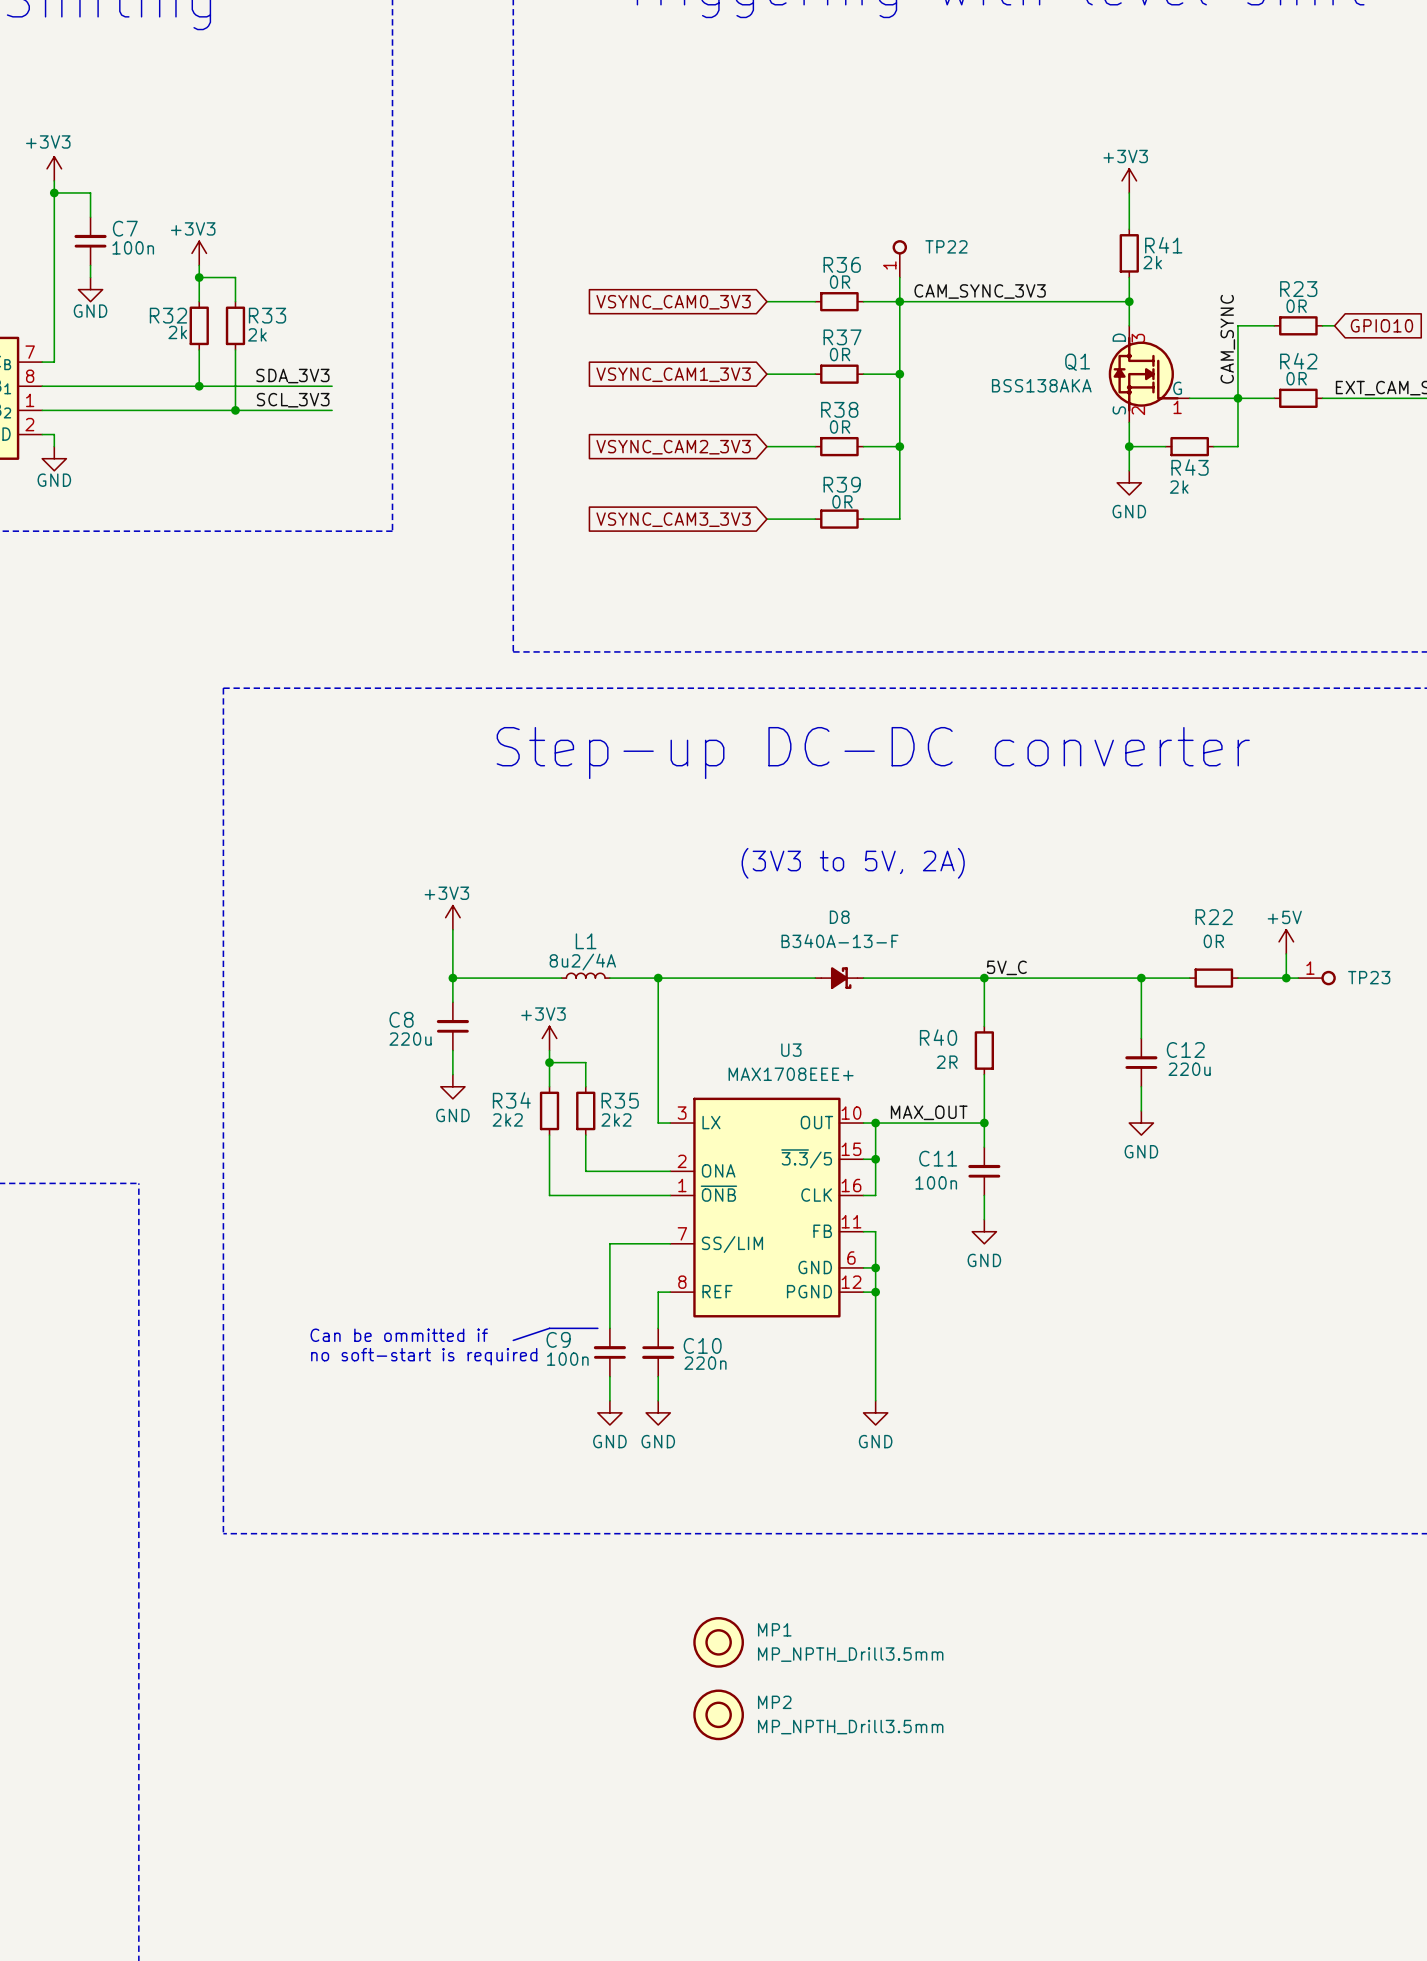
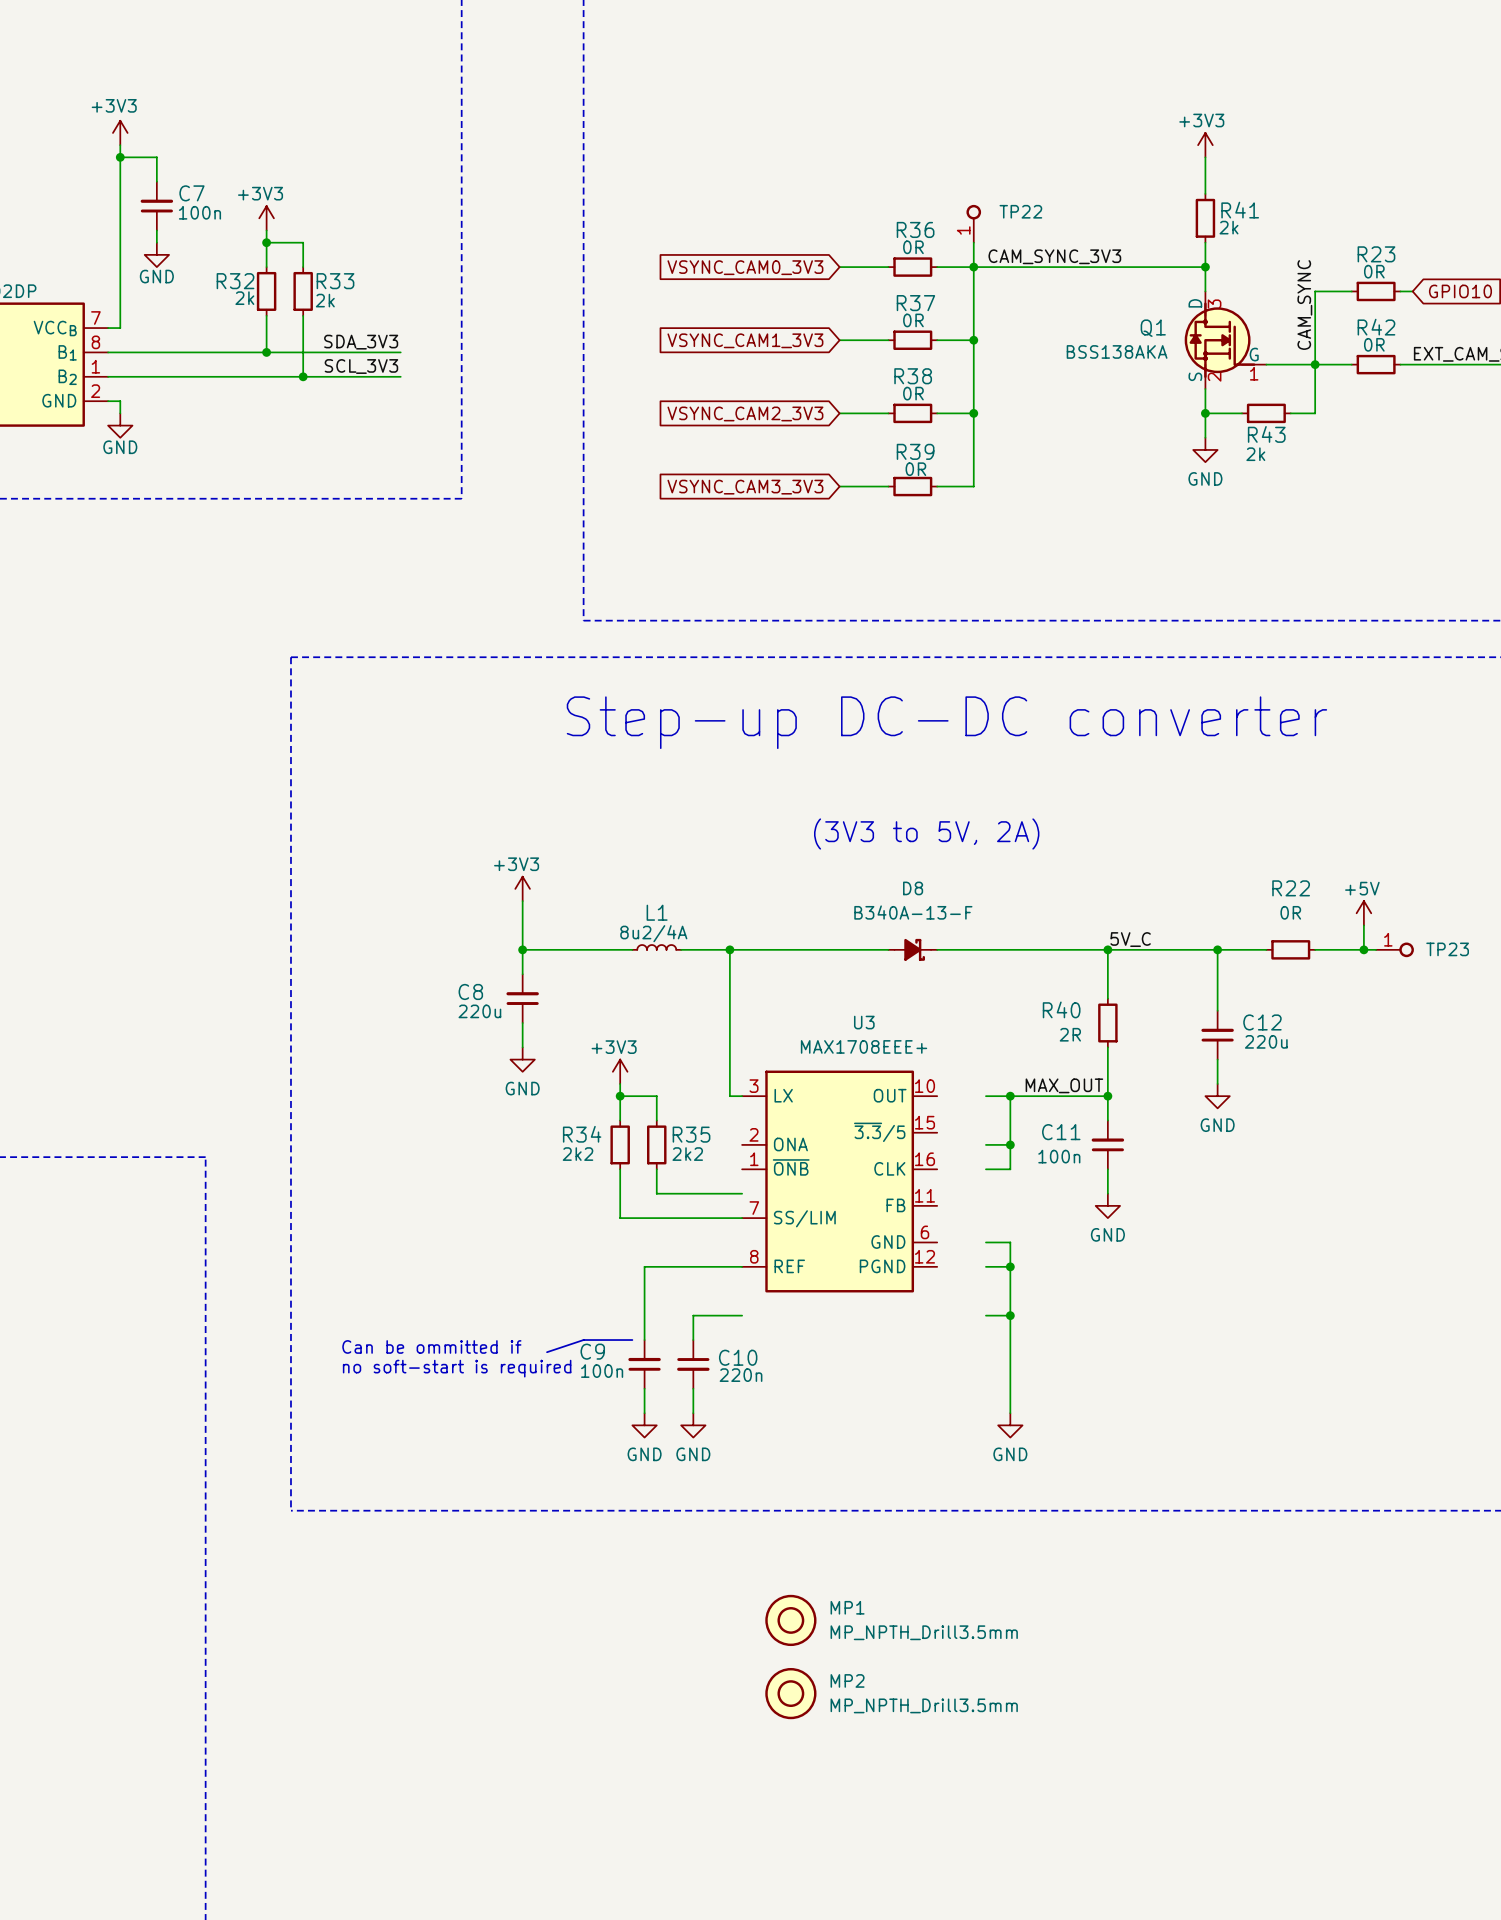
label position: 5V_C (1006, 967) -> 5V_C (1130, 939)
wire: (984, 978) (984, 1026) -> (1107, 949) (1107, 998)
junction position: (984, 978) -> (1107, 949)
power symbol position: +3V3 (549, 1038) -> +3V3 (620, 1071)
wire: (549, 1050) (549, 1086) -> none
R40 position: (984, 1050) -> (1107, 1023)
wire: (549, 1062) (585, 1062) (585, 1086) -> none
junction: (549, 1062) -> none
wire: (984, 1074) (984, 1147) -> (1107, 1047) (1107, 1120)
wire: none -> (620, 1083) (620, 1108)
R34 position: (549, 1110) -> (620, 1144)
R35 position: (585, 1110) -> (656, 1144)
label position: MAX_OUT (929, 1112) -> MAX_OUT (1064, 1085)
wire: none -> (620, 1096) (656, 1096) (656, 1108)
junction: none -> (620, 1096)
wire: (863, 1123) (911, 1123) -> (1059, 1096) (1107, 1096)
wire: (875, 1123) (875, 1195) (863, 1195) -> none
junction: (875, 1123) -> none
wire: none -> (1010, 1096) (1010, 1169) (985, 1169)
junction: none -> (1010, 1096)
junction: (984, 1123) -> none
junction: none -> (1107, 1096)
wire: (549, 1147) (549, 1195) (670, 1195) -> none
wire: (585, 1147) (585, 1171) (670, 1171) -> (656, 1169) (656, 1193) (742, 1193)
wire: (863, 1159) (875, 1159) -> none
junction: (875, 1159) -> none
wire: none -> (985, 1144) (1010, 1144)
junction: none -> (1010, 1144)
C11 position: (984, 1171) -> (1107, 1144)
wire: (984, 1195) (984, 1219) -> (1107, 1169) (1107, 1193)
wire: (863, 1231) (875, 1231) (875, 1400) -> none
power symbol position: GND (984, 1231) -> GND (1107, 1205)
wire: (609, 1243) (609, 1328) -> (681, 1218) (620, 1218) (620, 1169)
wire: (863, 1267) (875, 1267) -> none
junction: (875, 1267) -> none
wire: none -> (985, 1242) (1010, 1242) (1010, 1413)
wire: (658, 1292) (658, 1328) -> (729, 1266) (644, 1266) (644, 1340)
wire: (863, 1292) (875, 1292) -> none
junction: (875, 1292) -> none
wire: none -> (985, 1266) (1010, 1266)
junction: none -> (1010, 1266)
line: (597, 1328) (549, 1328) (513, 1340) -> (632, 1340) (583, 1340) (547, 1352)
text position: Can be ommitted if (399, 1335) -> Can be ommitted if (431, 1346)
wire: none -> (742, 1315) (693, 1315) (693, 1340)
wire: none -> (985, 1315) (1010, 1315)
junction: none -> (1010, 1315)
C9 position: (609, 1352) -> (644, 1364)
C10 position: (658, 1352) -> (693, 1364)
text position: no soft-start is required (424, 1356) -> no soft-start is required (457, 1368)
wire: (609, 1376) (609, 1400) -> (644, 1388) (644, 1413)
wire: (658, 1376) (658, 1400) -> (693, 1388) (693, 1413)
power symbol: GND (609, 1412) -> none
power symbol: GND (658, 1412) -> none
power symbol position: GND (875, 1412) -> GND (1010, 1425)
power symbol: none -> GND (644, 1425)
power symbol: none -> GND (693, 1425)

